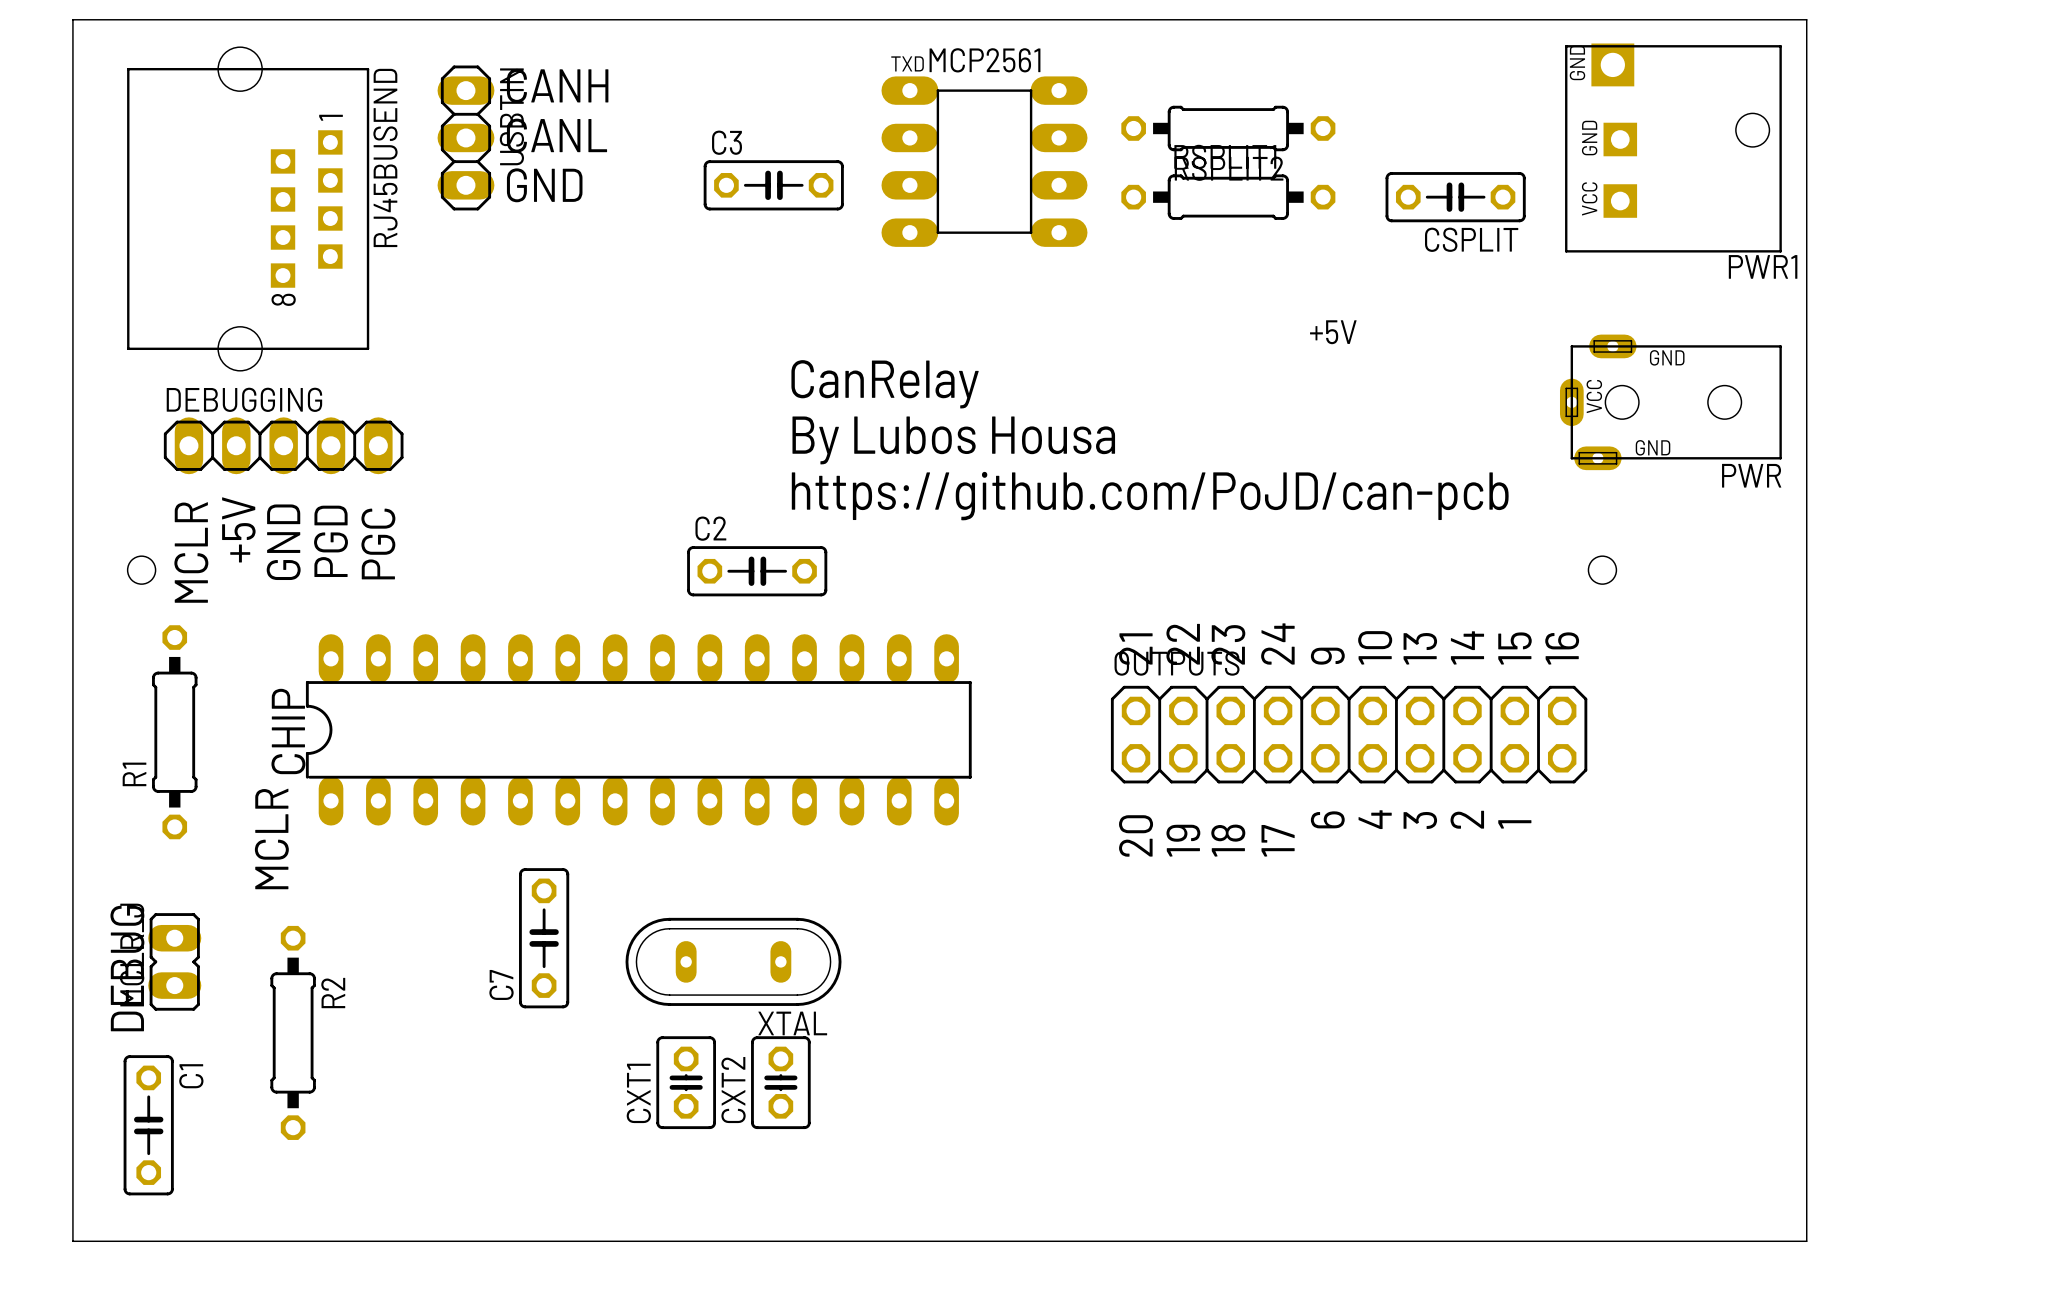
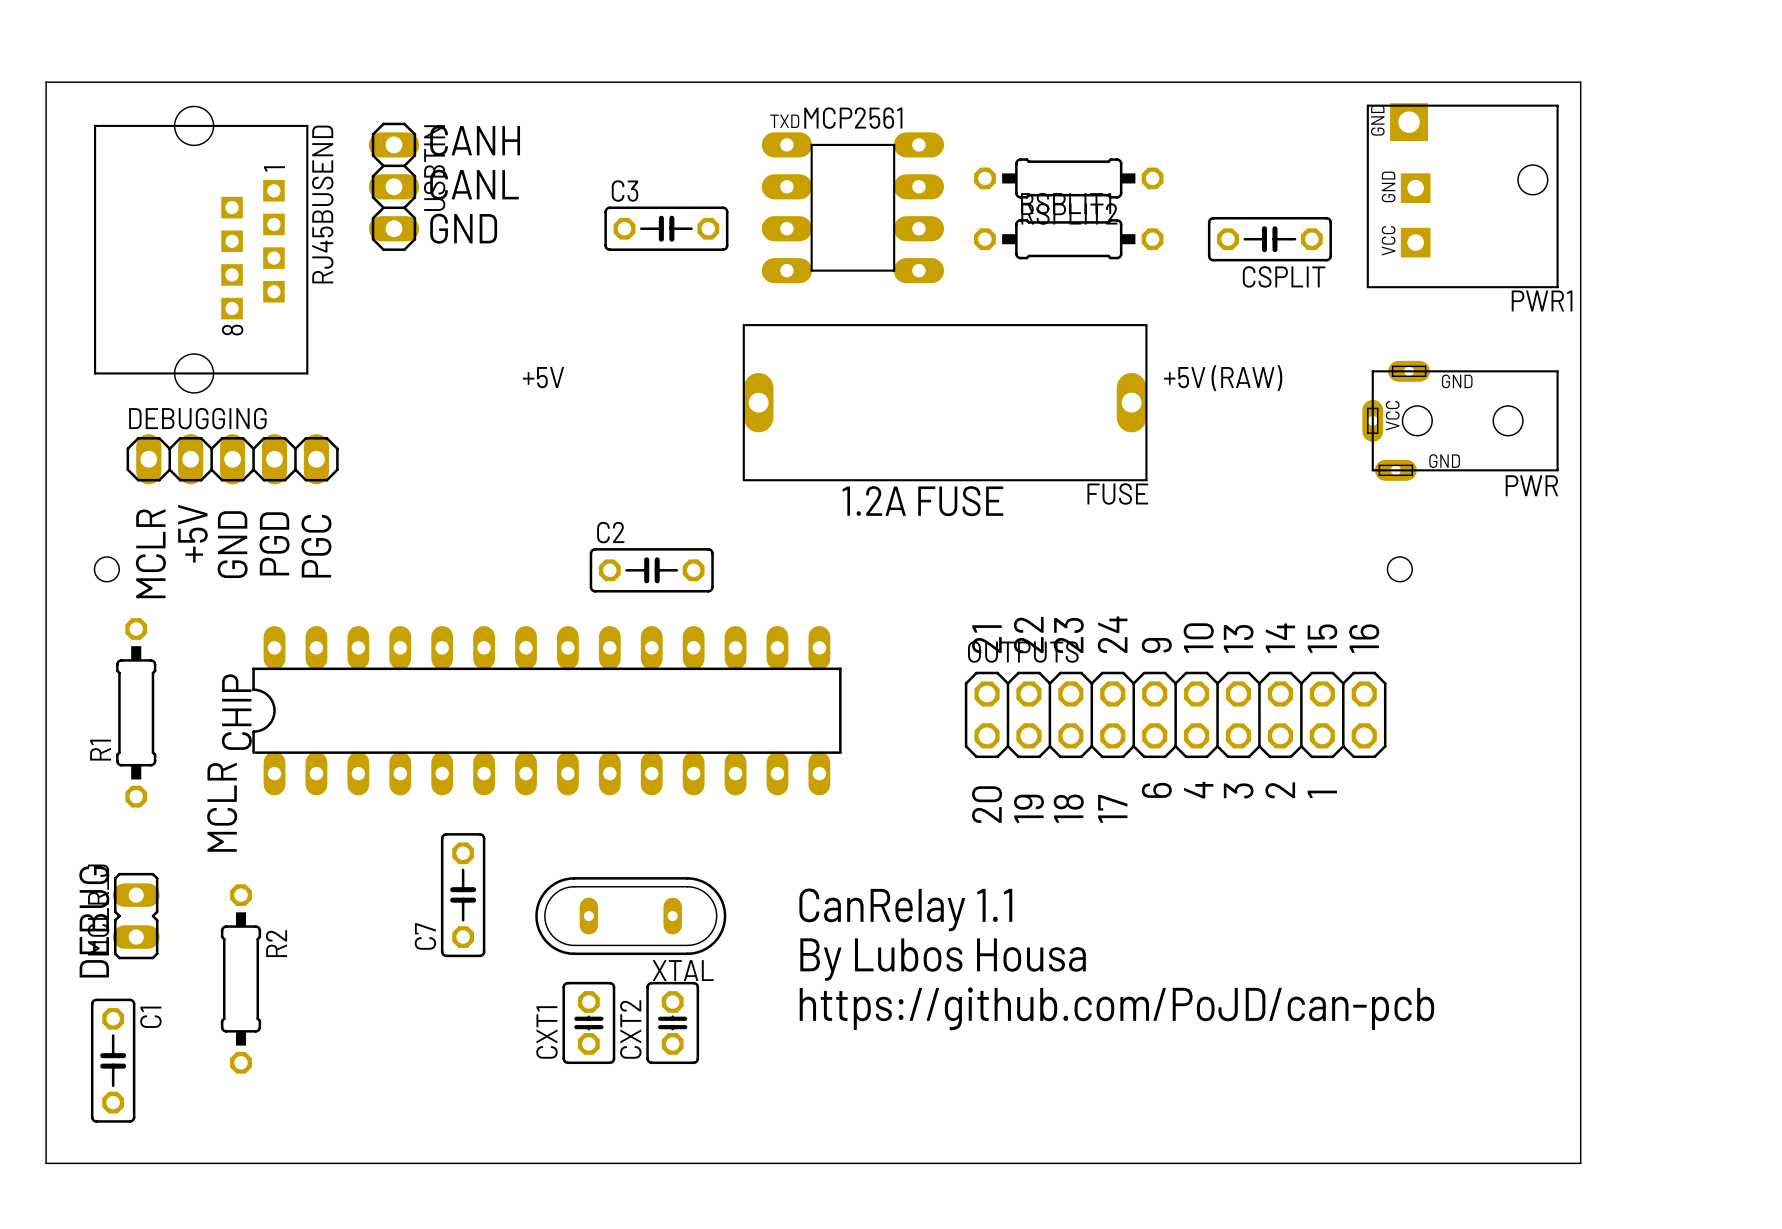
text: +5V (1333, 332) -> none
text: none -> +5V (543, 377)
text: none -> +5V (RAW) (1223, 378)
FUSE: none -> (945, 402)
text: CanRelay (885, 384) -> none
text: By Lubos Housa (953, 440) -> none
text: none -> 1.2A FUSE (922, 501)
text: https://github.com/PoJD/can-pcb (1150, 496) -> none
text: none -> CanRelay 1.1 (905, 909)
text: none -> By Lubos Housa (943, 959)
text: none -> https://github.com/PoJD/can-pcb (1116, 1008)

